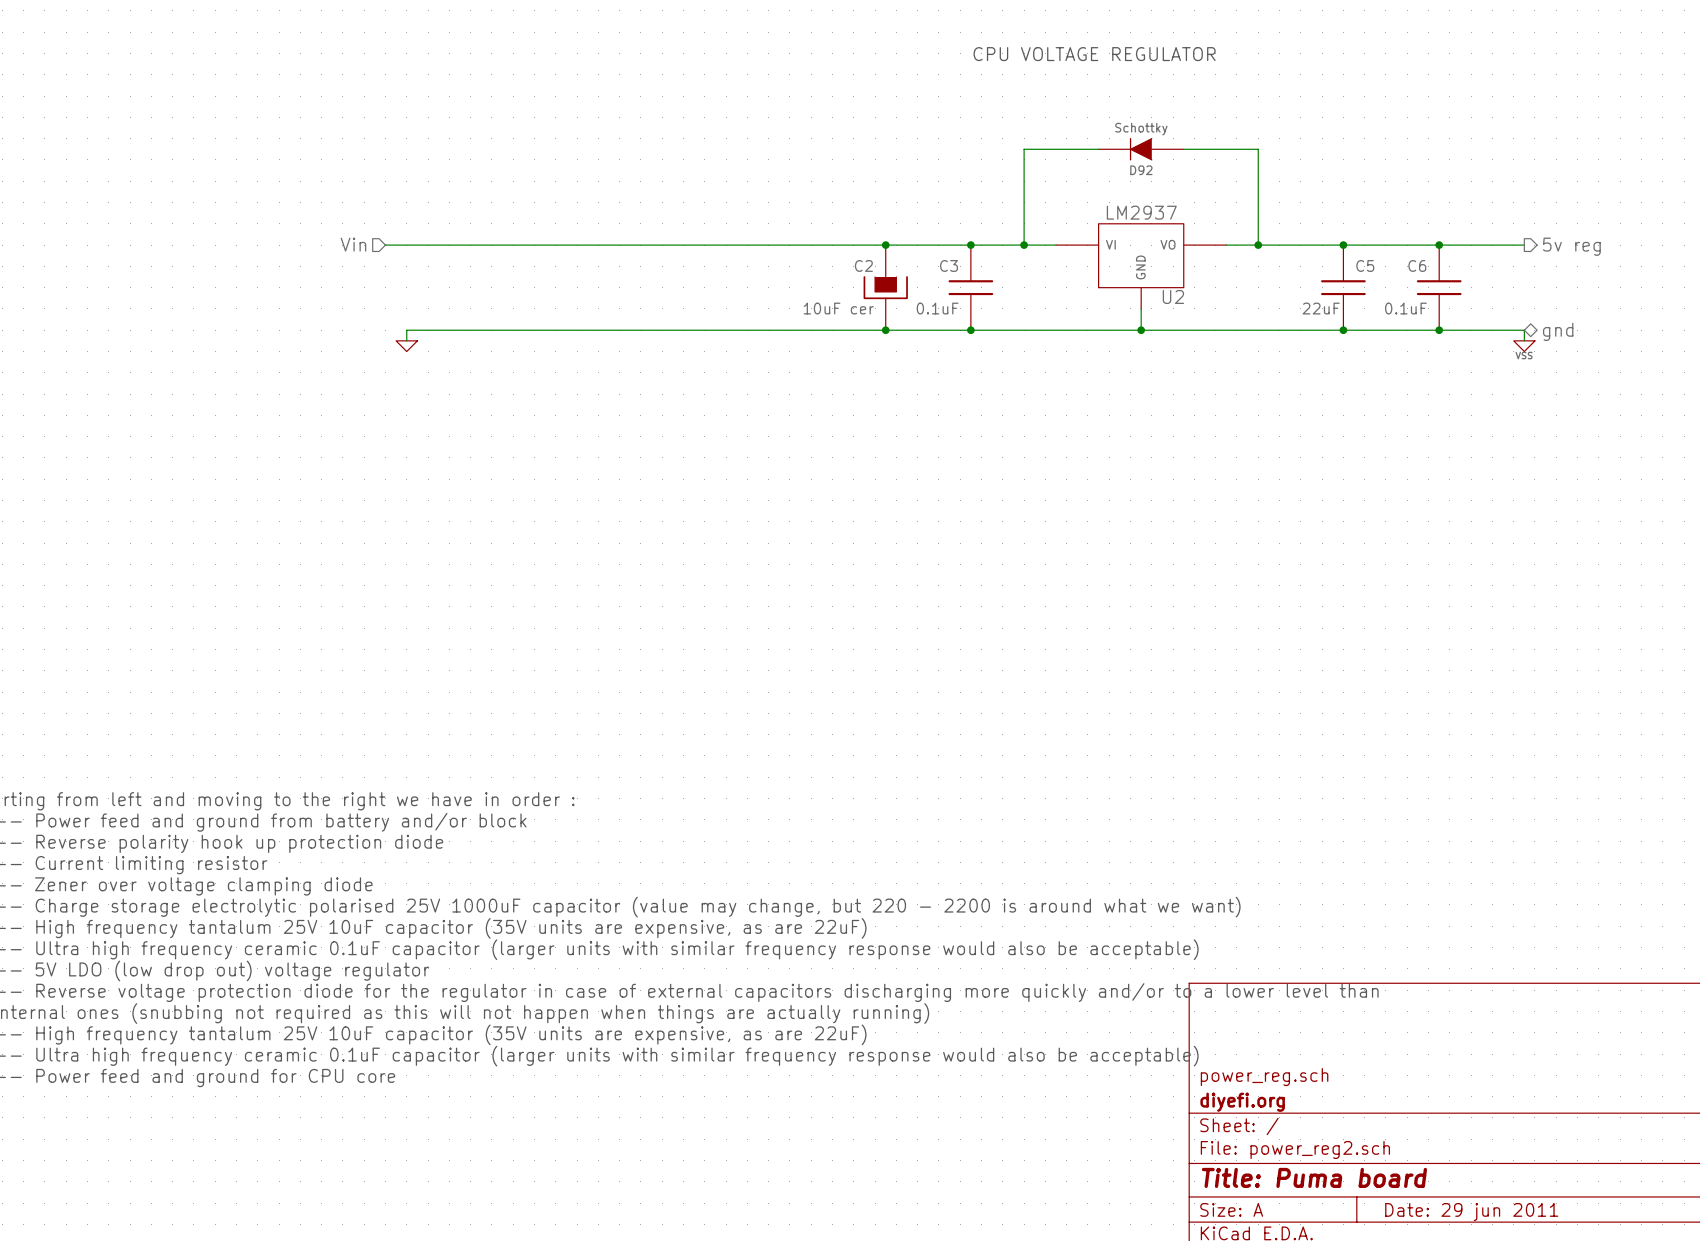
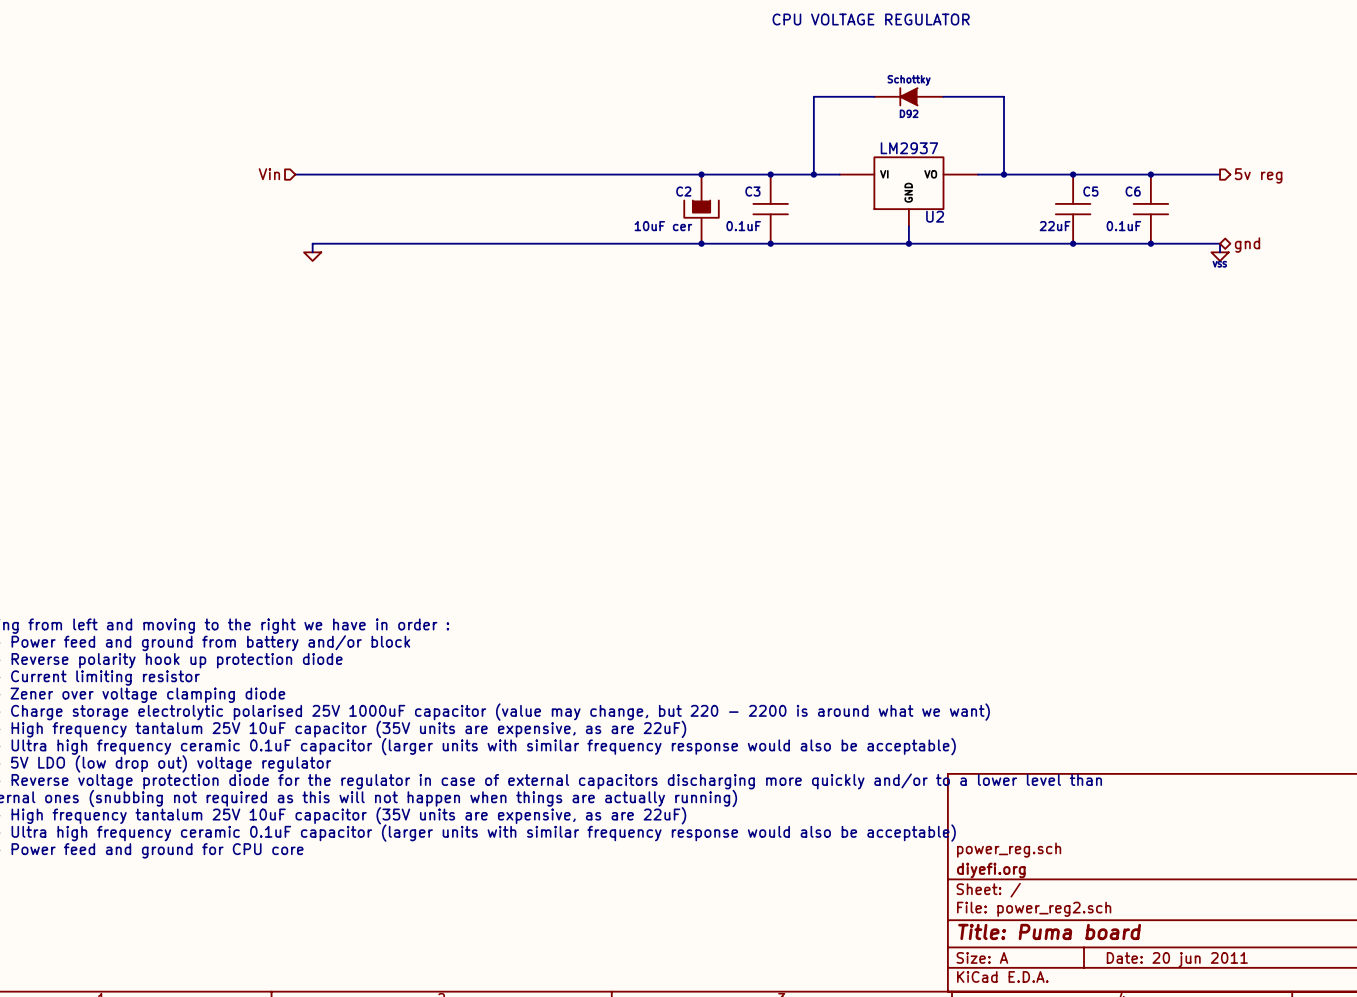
title block: Date: 29 jun 2011 (1471, 1212) -> Date: 20 jun 2011 (1177, 959)

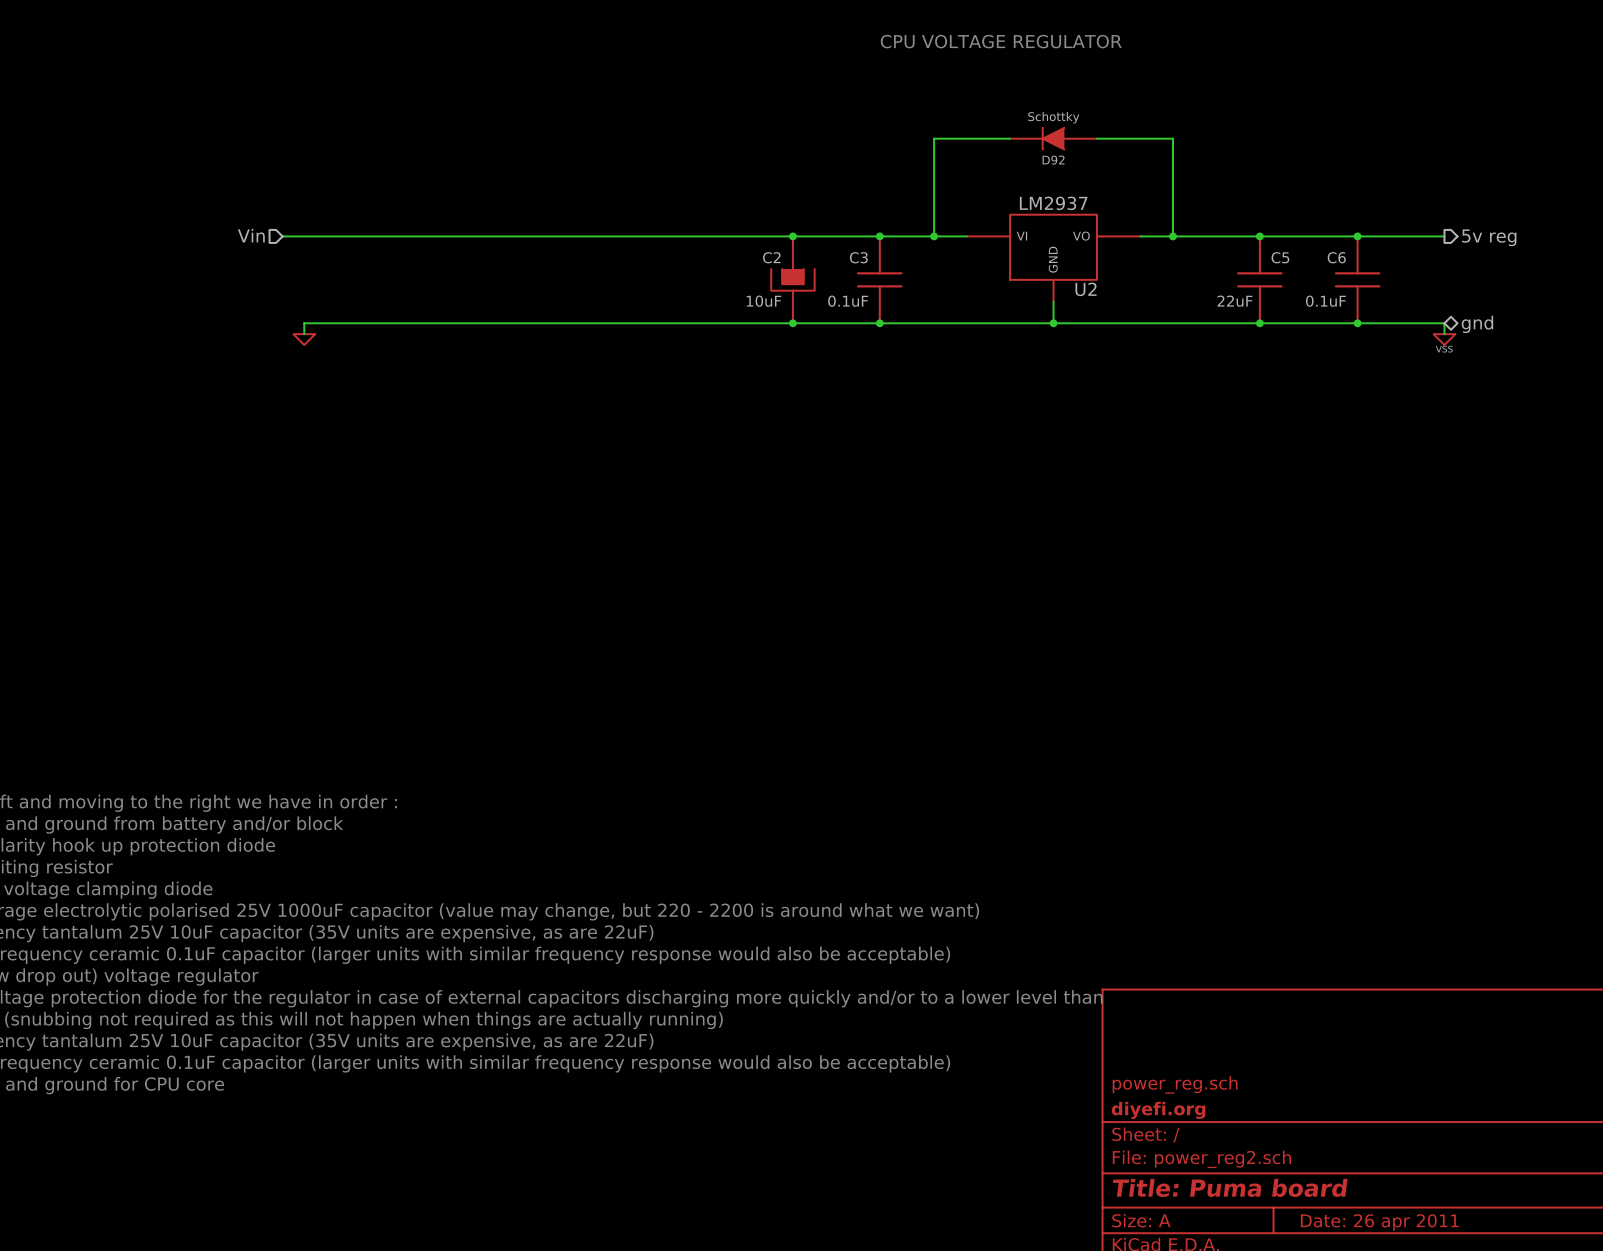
C2 value: 10uF cer (663, 226) -> 10uF (763, 301)
title block: Date: 20 jun 2011 (1177, 959) -> Date: 26 apr 2011 (1379, 1222)

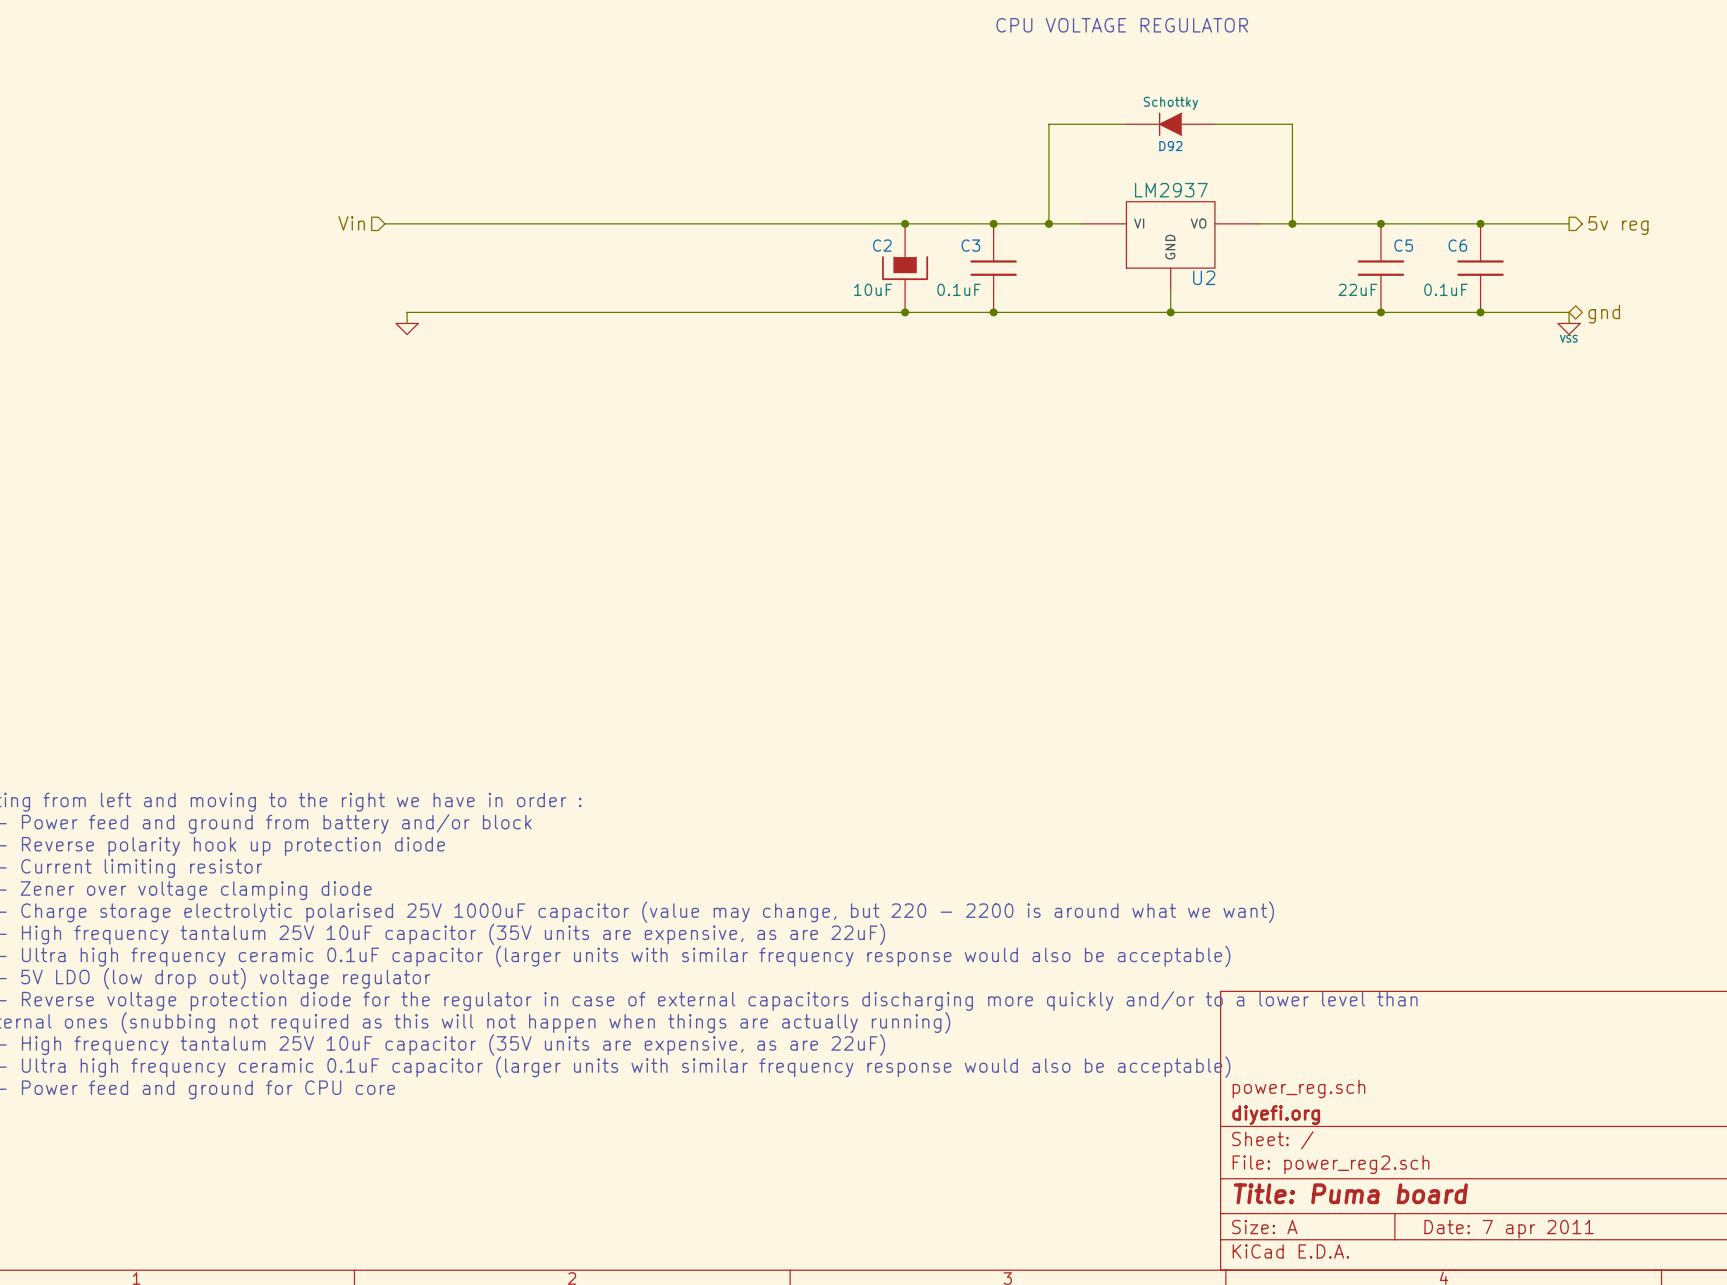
title block: Date: 26 apr 2011 (1379, 1222) -> Date: 7 apr 2011 (1509, 1229)

